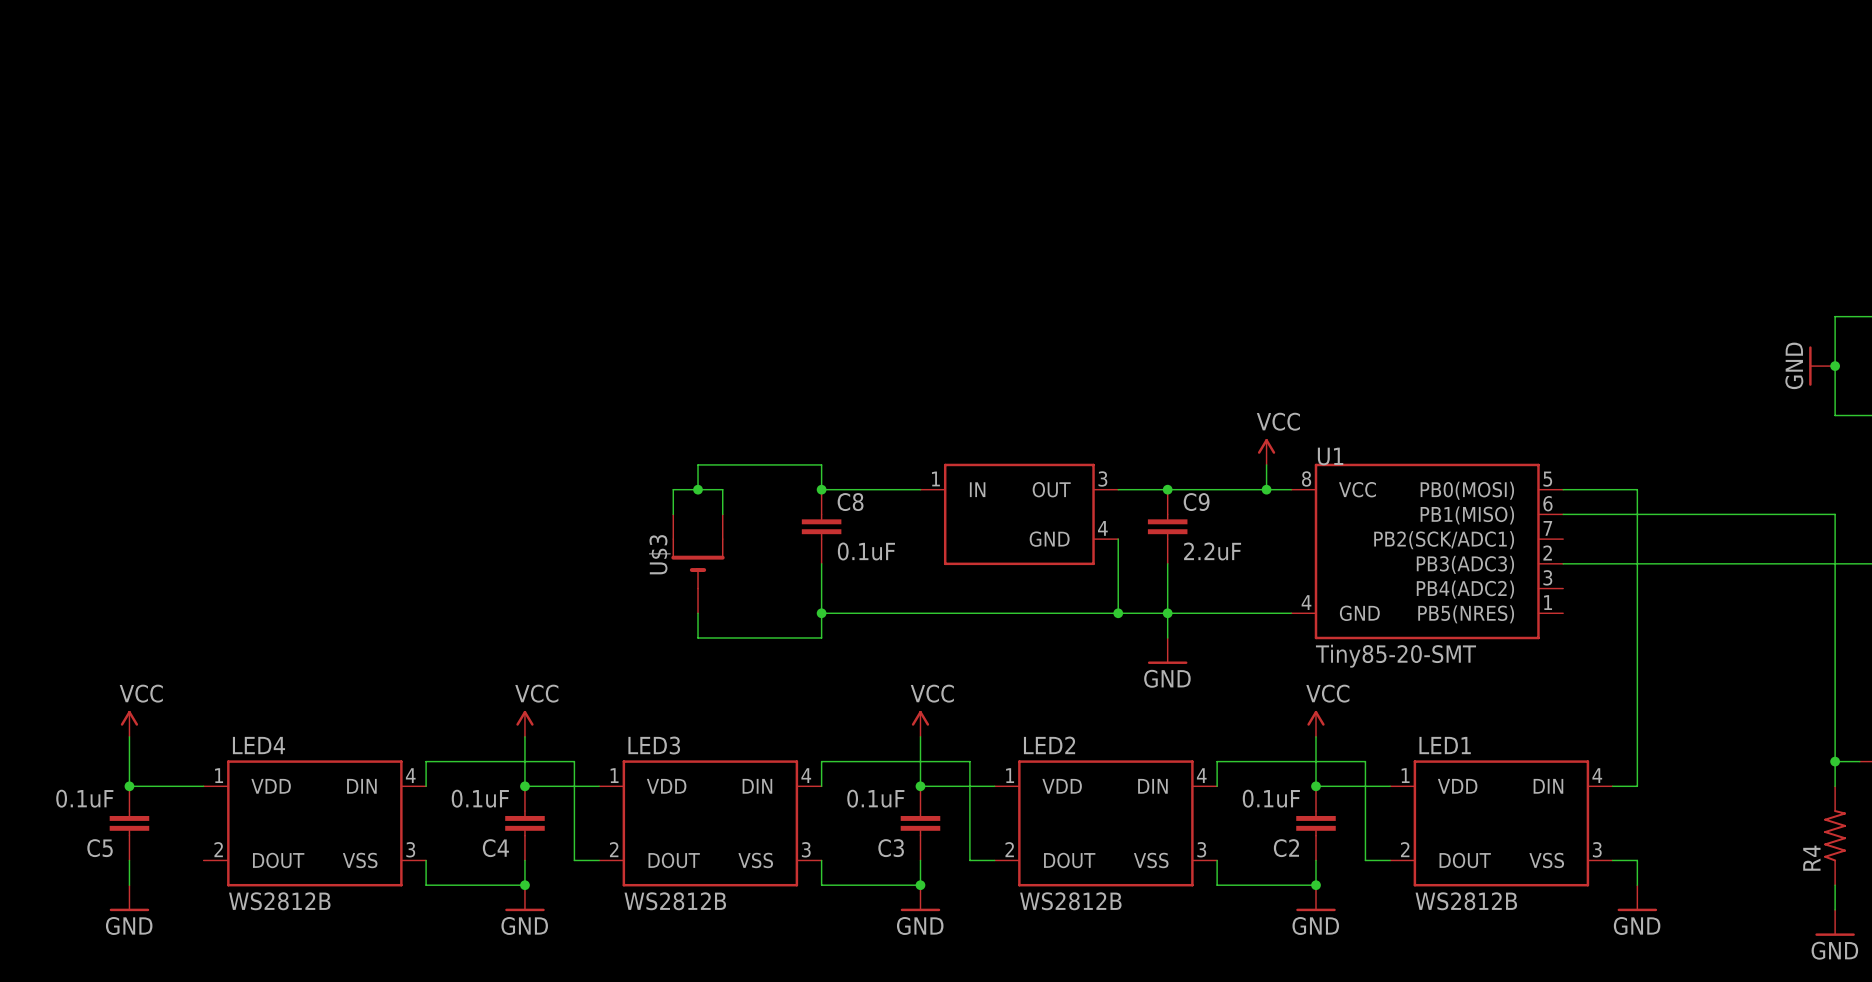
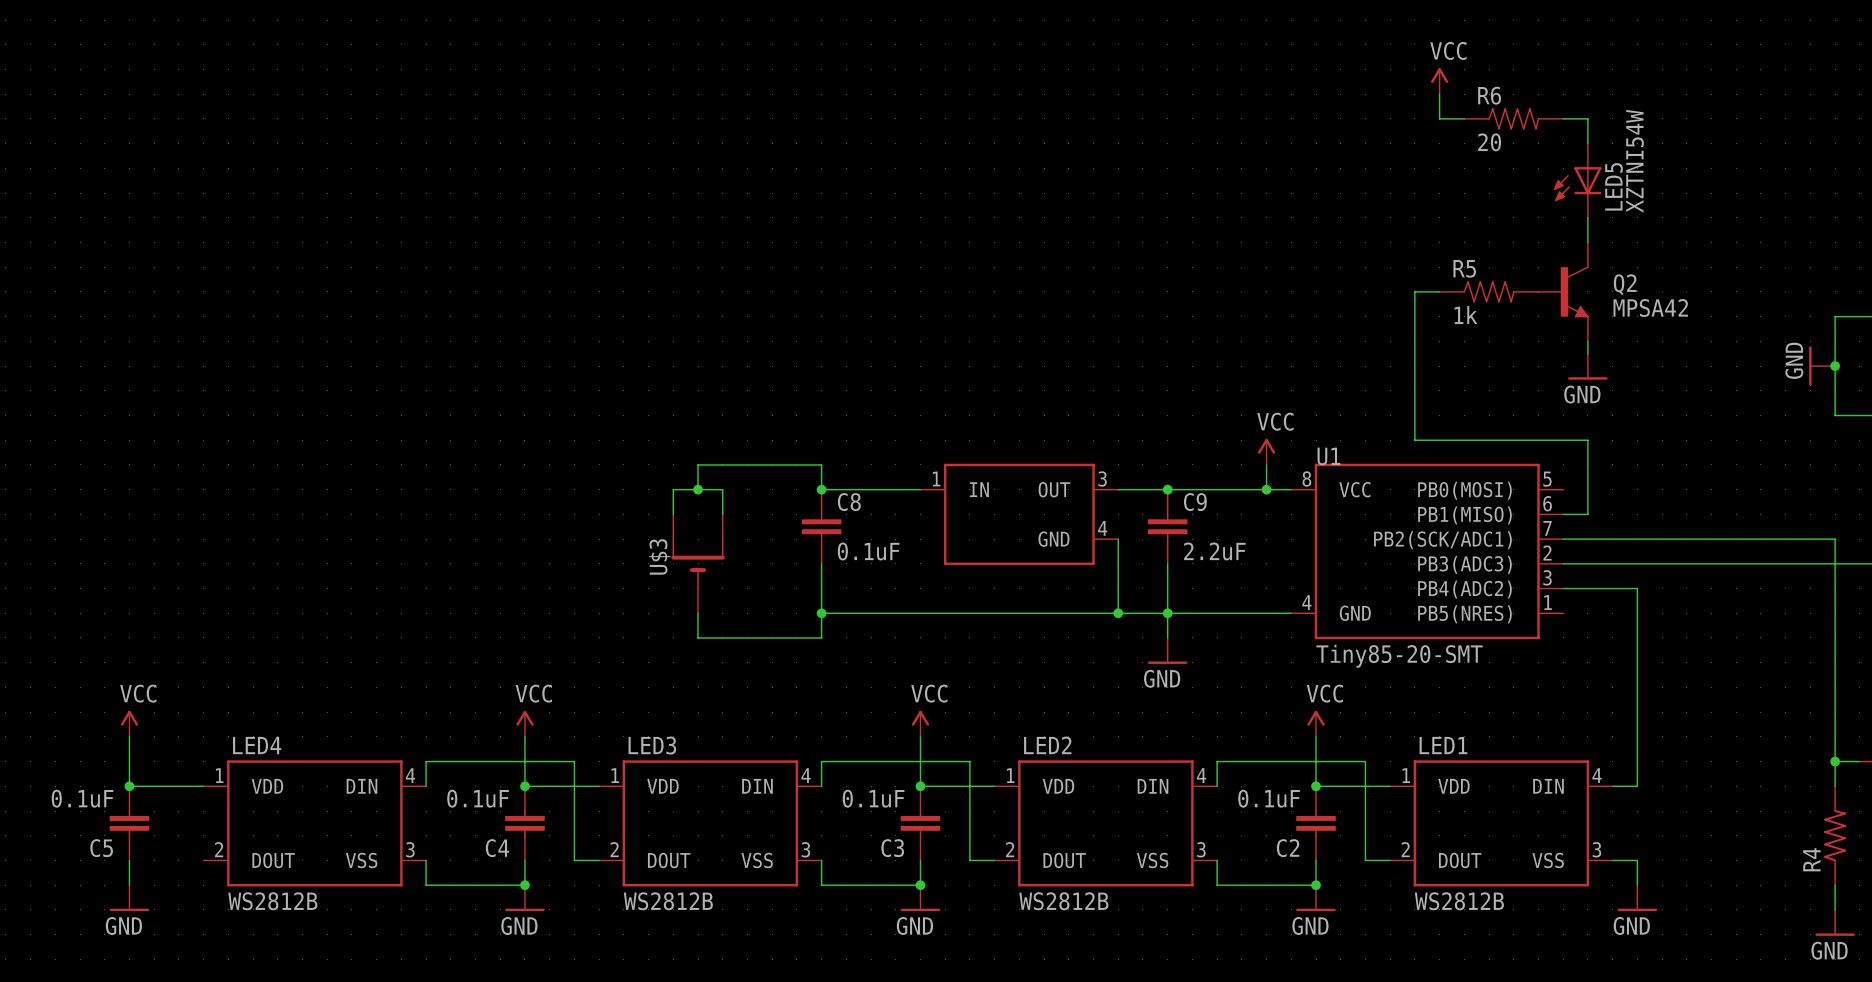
power symbol: none -> VCC (1439, 81)
wire: none -> (1439, 94) (1439, 118) (1464, 118)
R6: none -> 20 (1513, 118)
wire: none -> (1563, 118) (1587, 118) (1587, 143)
LED5: none -> XZTNI54W (1577, 180)
wire: none -> (1587, 217) (1587, 242)
wire: none -> (1439, 291) (1414, 291) (1414, 440) (1587, 440) (1587, 514)
R5: none -> 1k (1489, 291)
Q2: none -> MPSA42 (1563, 291)
wire: none -> (1587, 341) (1587, 353)
power symbol: none -> GND (1587, 366)
wire: (1563, 489) (1637, 489) (1637, 588) -> (1563, 588) (1637, 588)
wire: (1587, 514) (1835, 514) (1835, 539) -> (1563, 539) (1835, 539)

